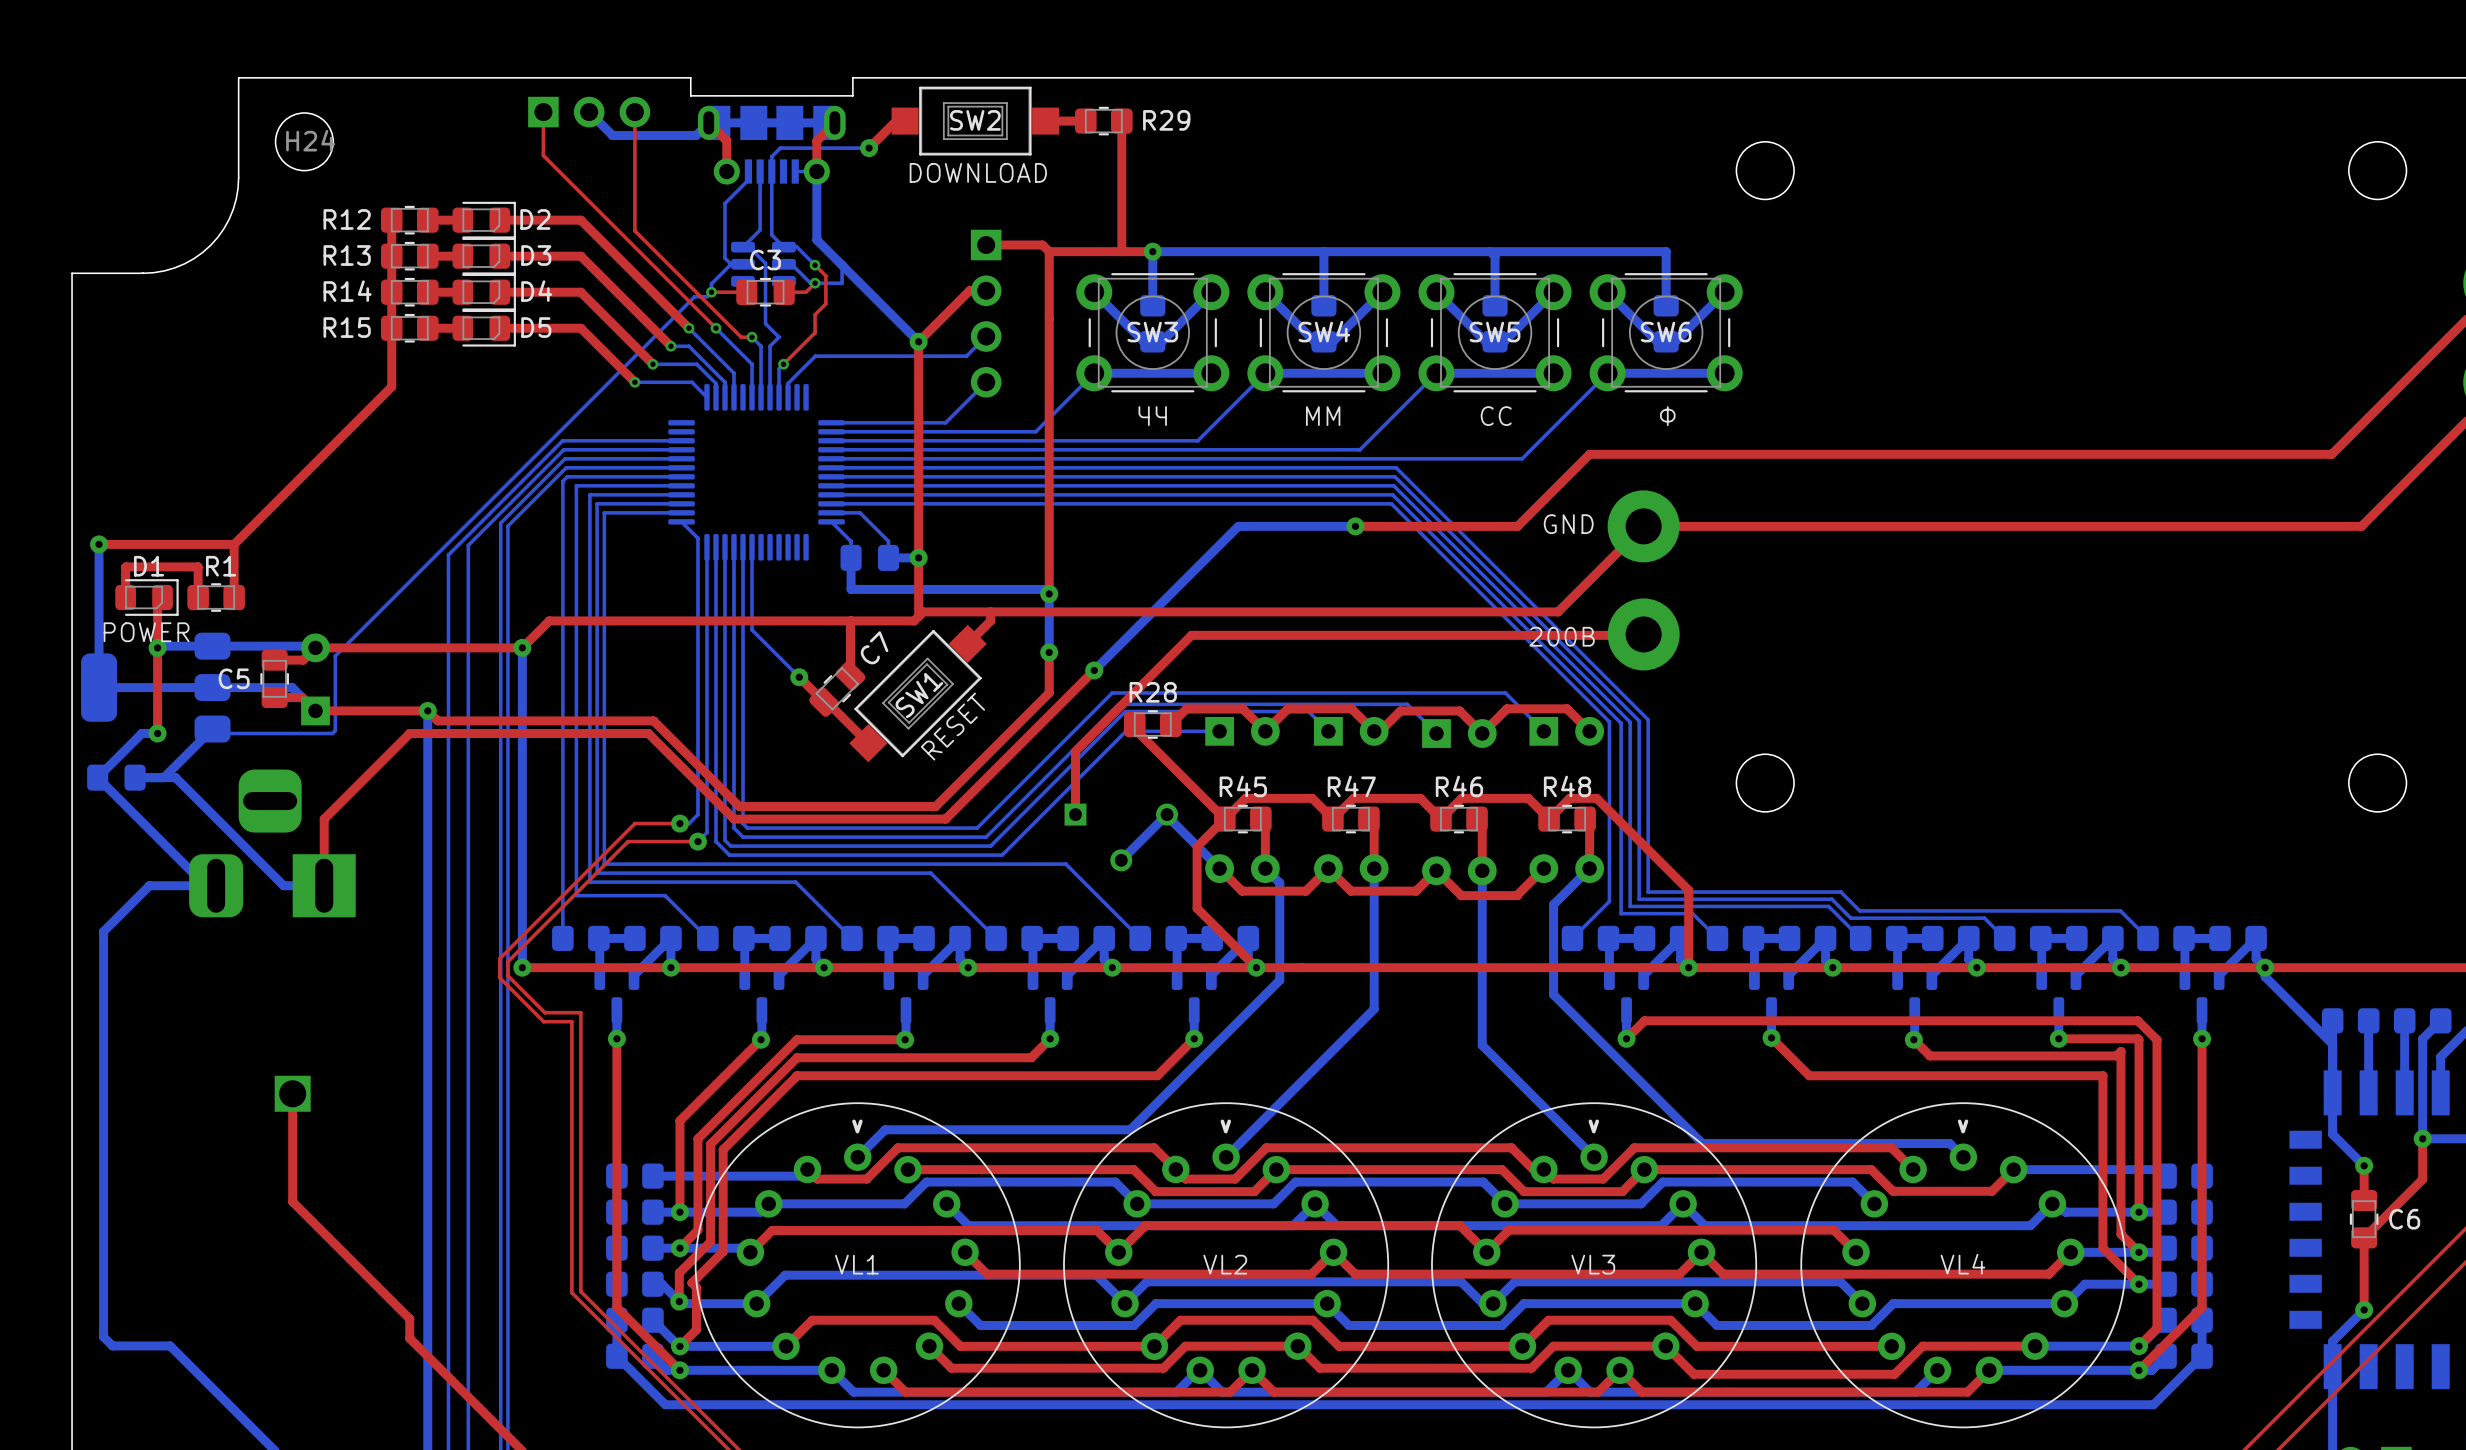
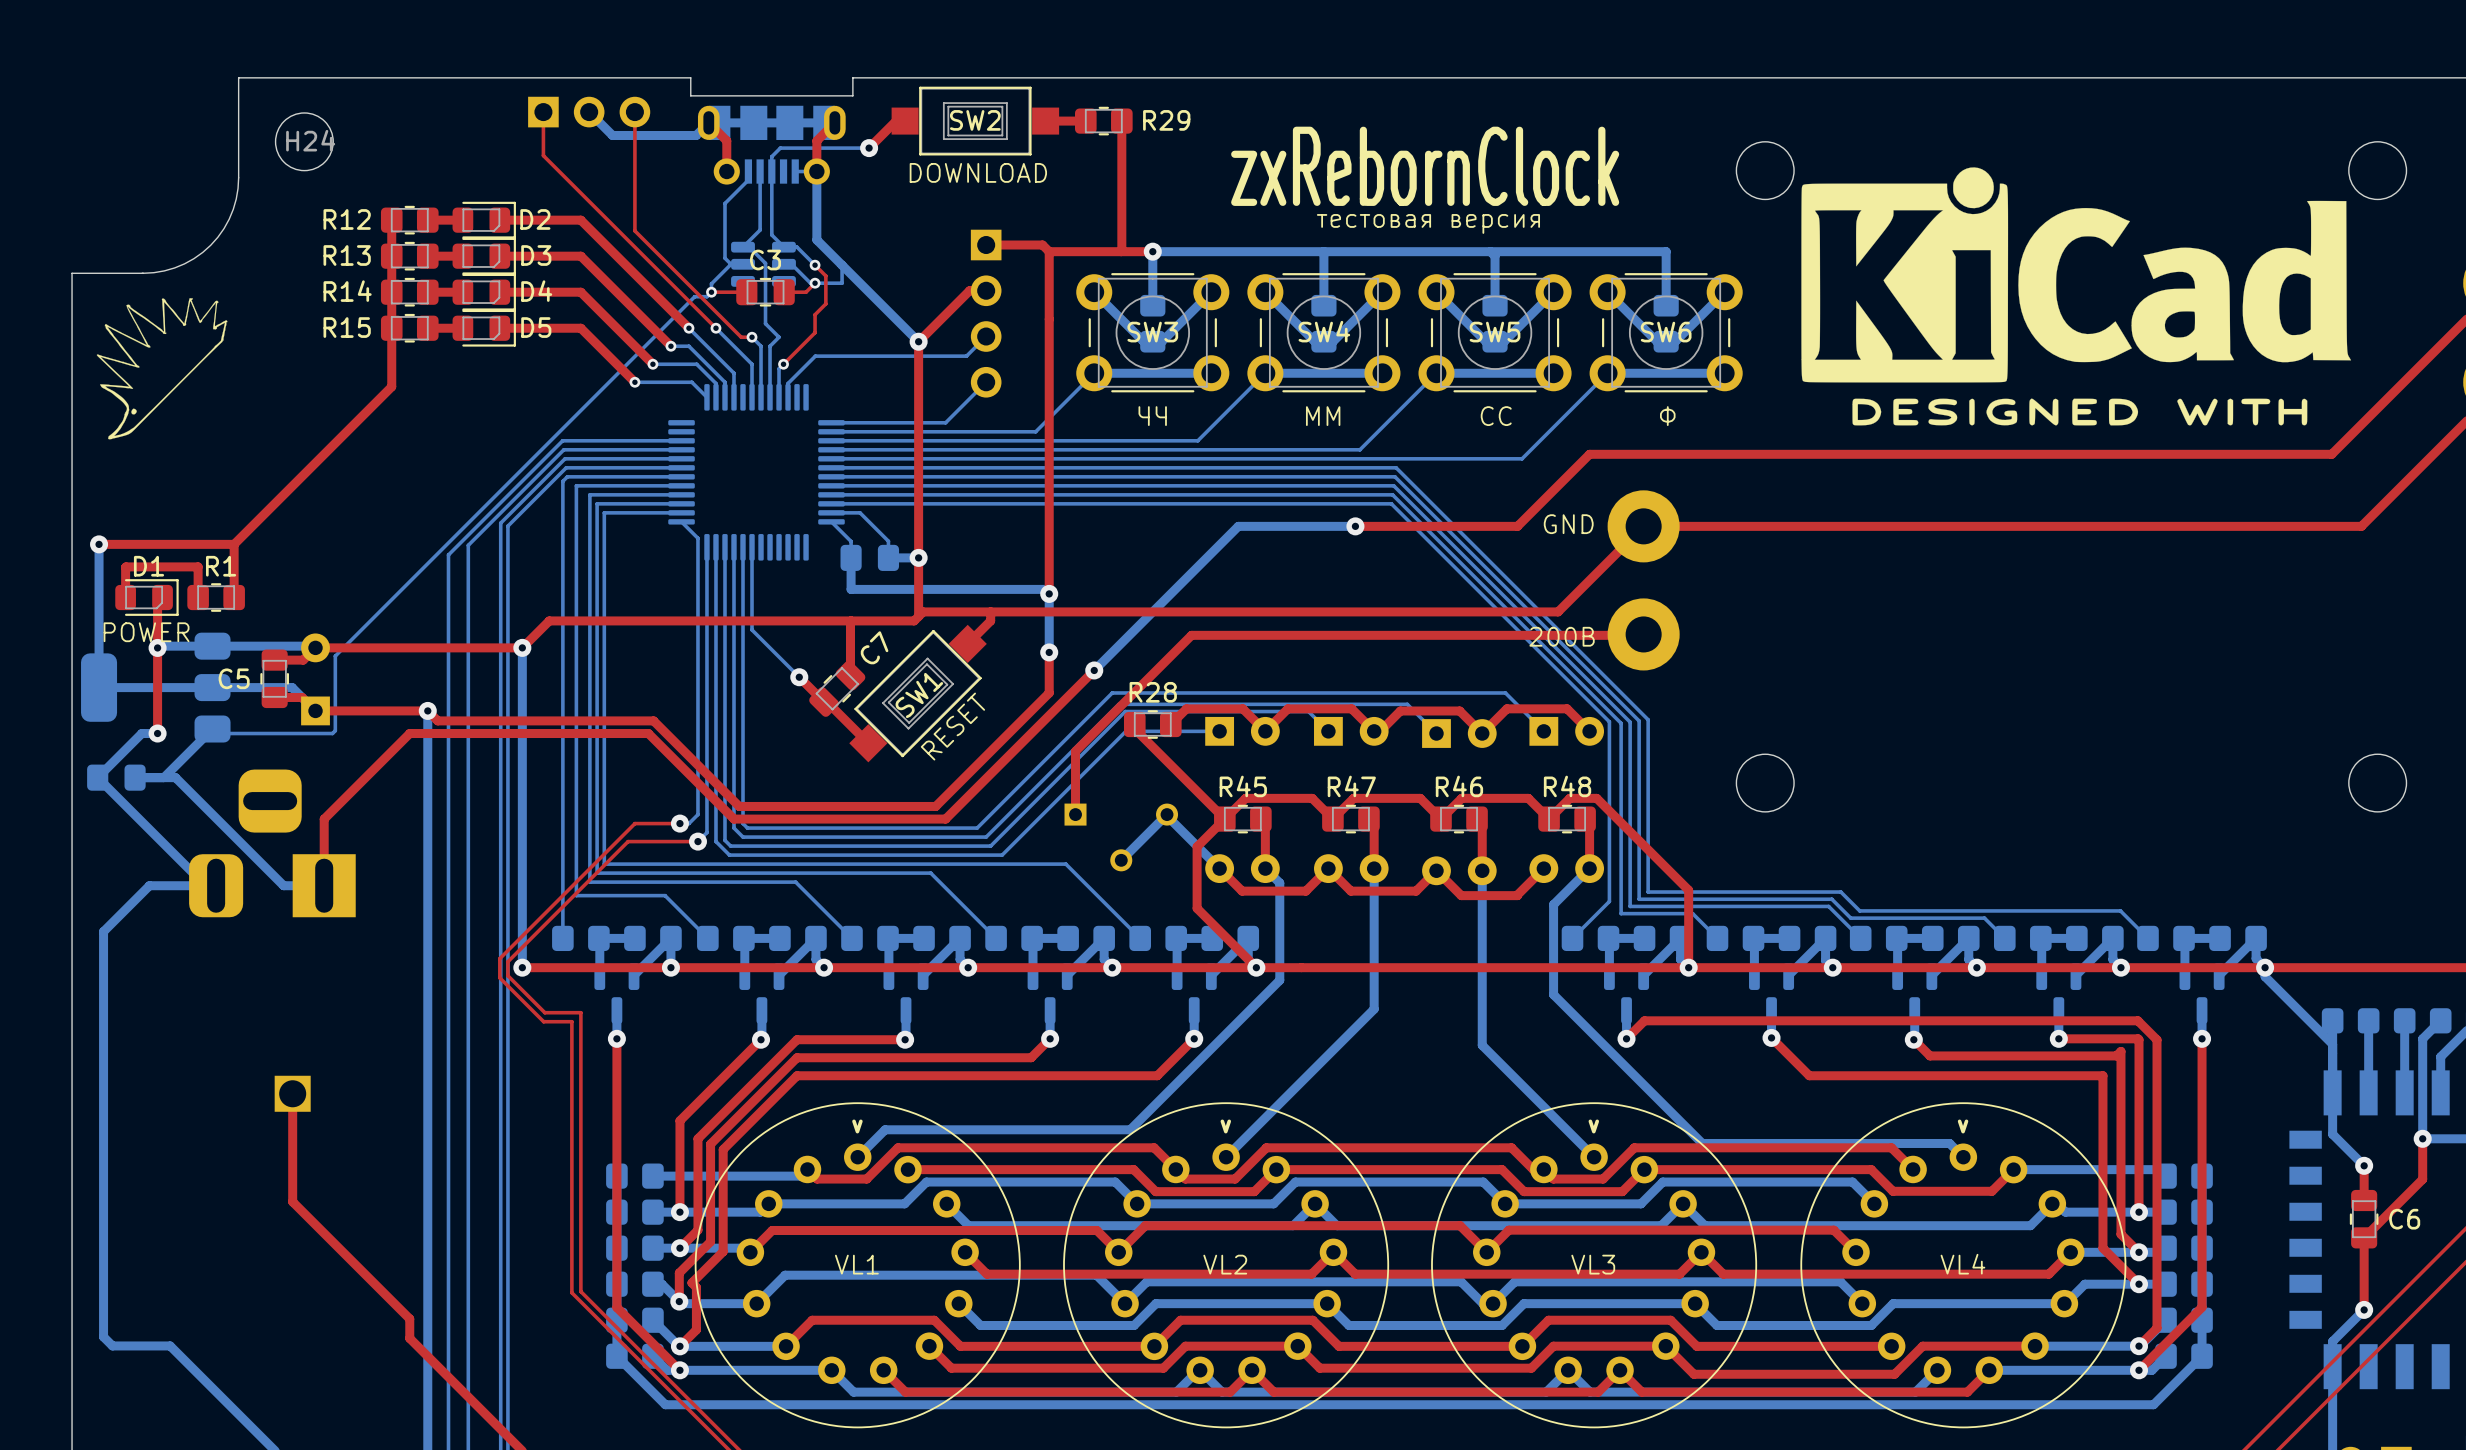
text: none -> zxRebornClock (1425, 166)
drawing: none -> [1801, 167, 2352, 426]
text: none -> тестовая версия (1428, 223)
drawing: none -> [96, 298, 228, 440]

